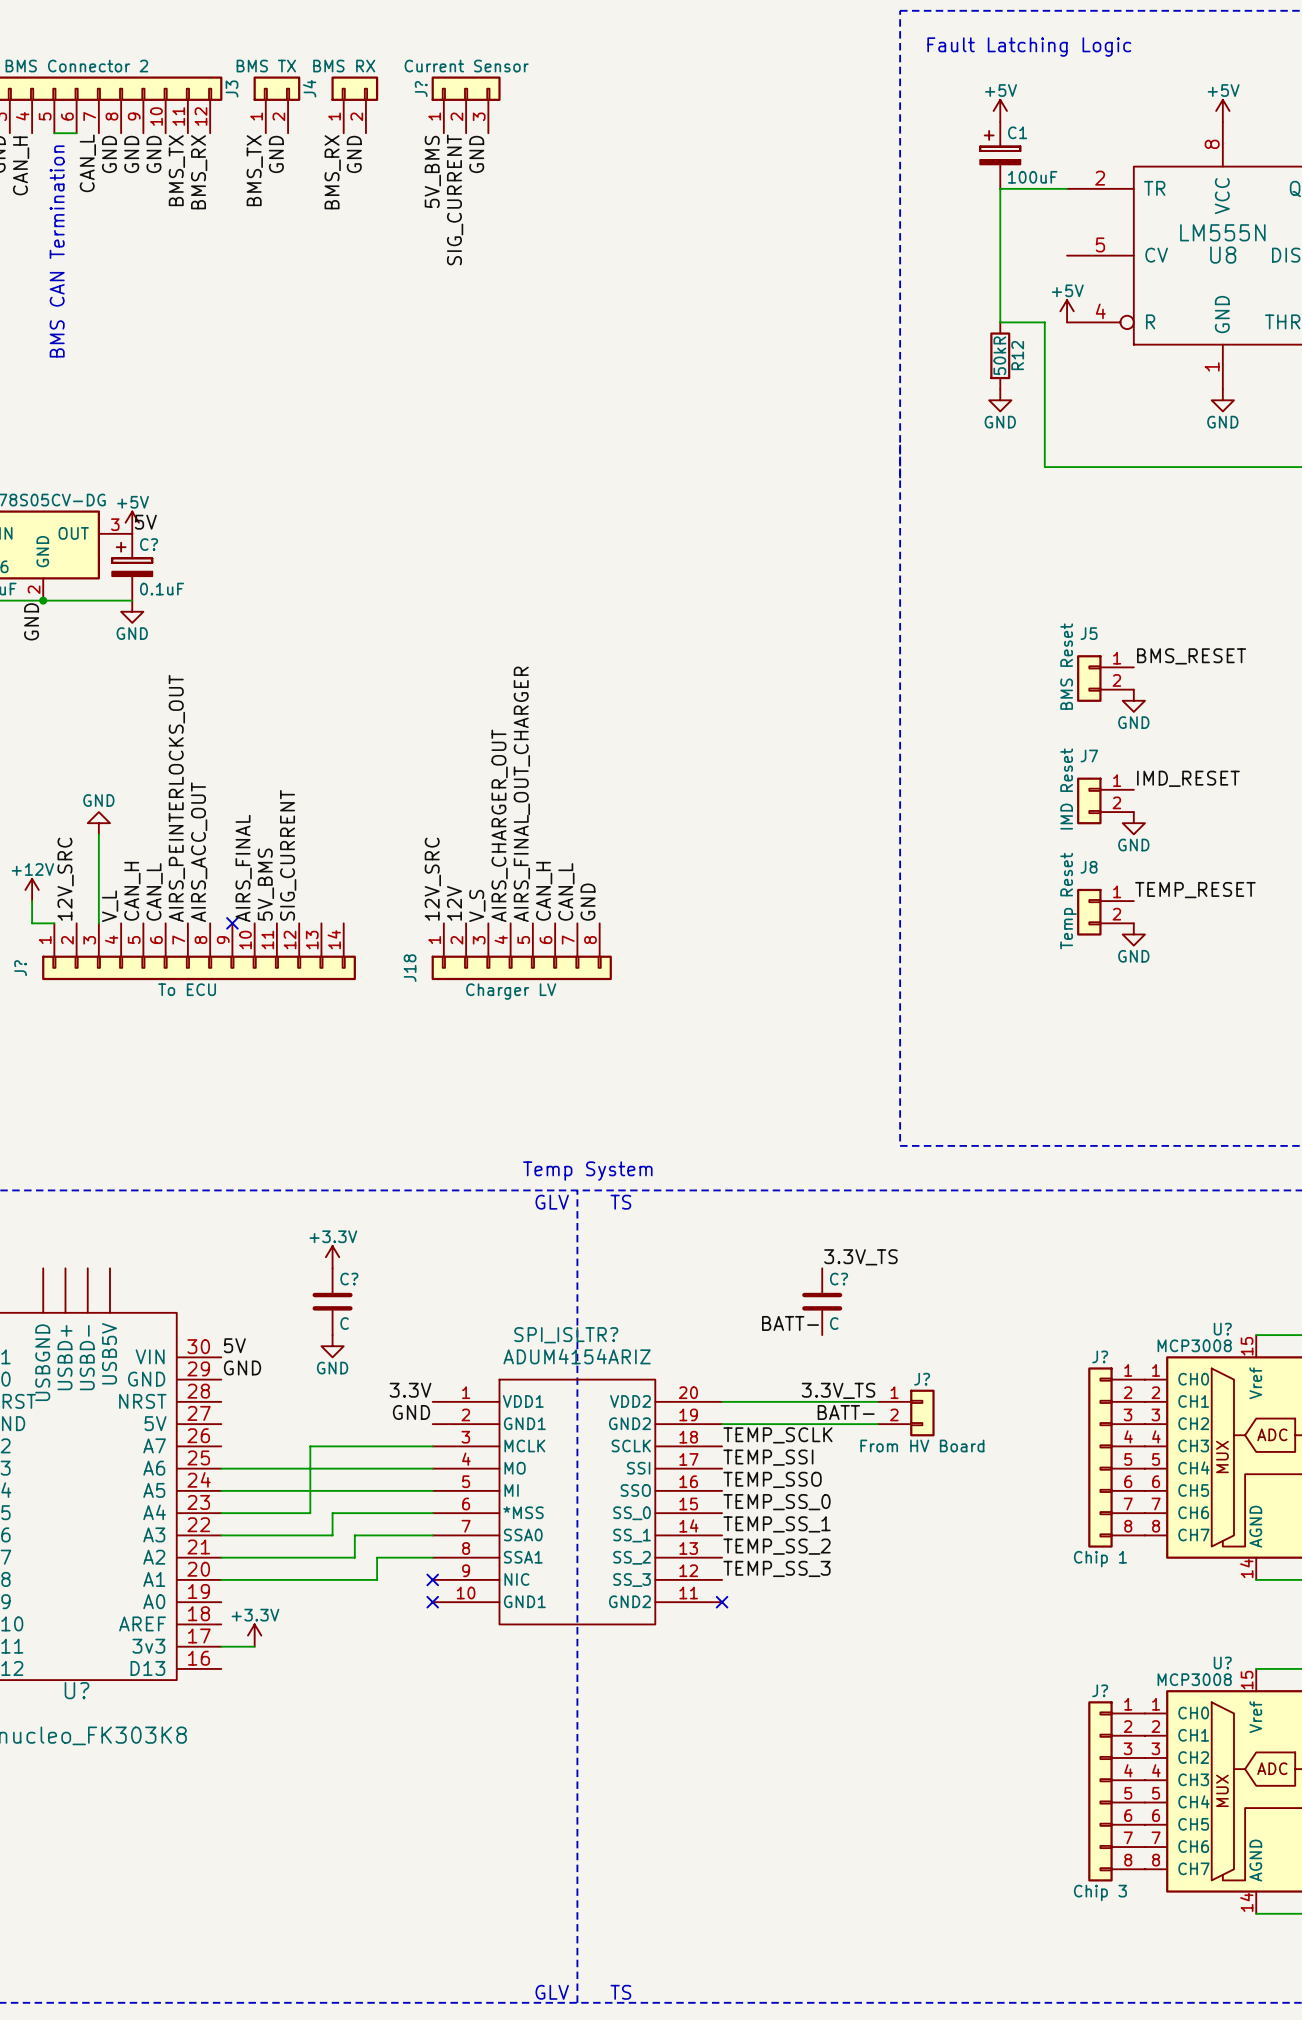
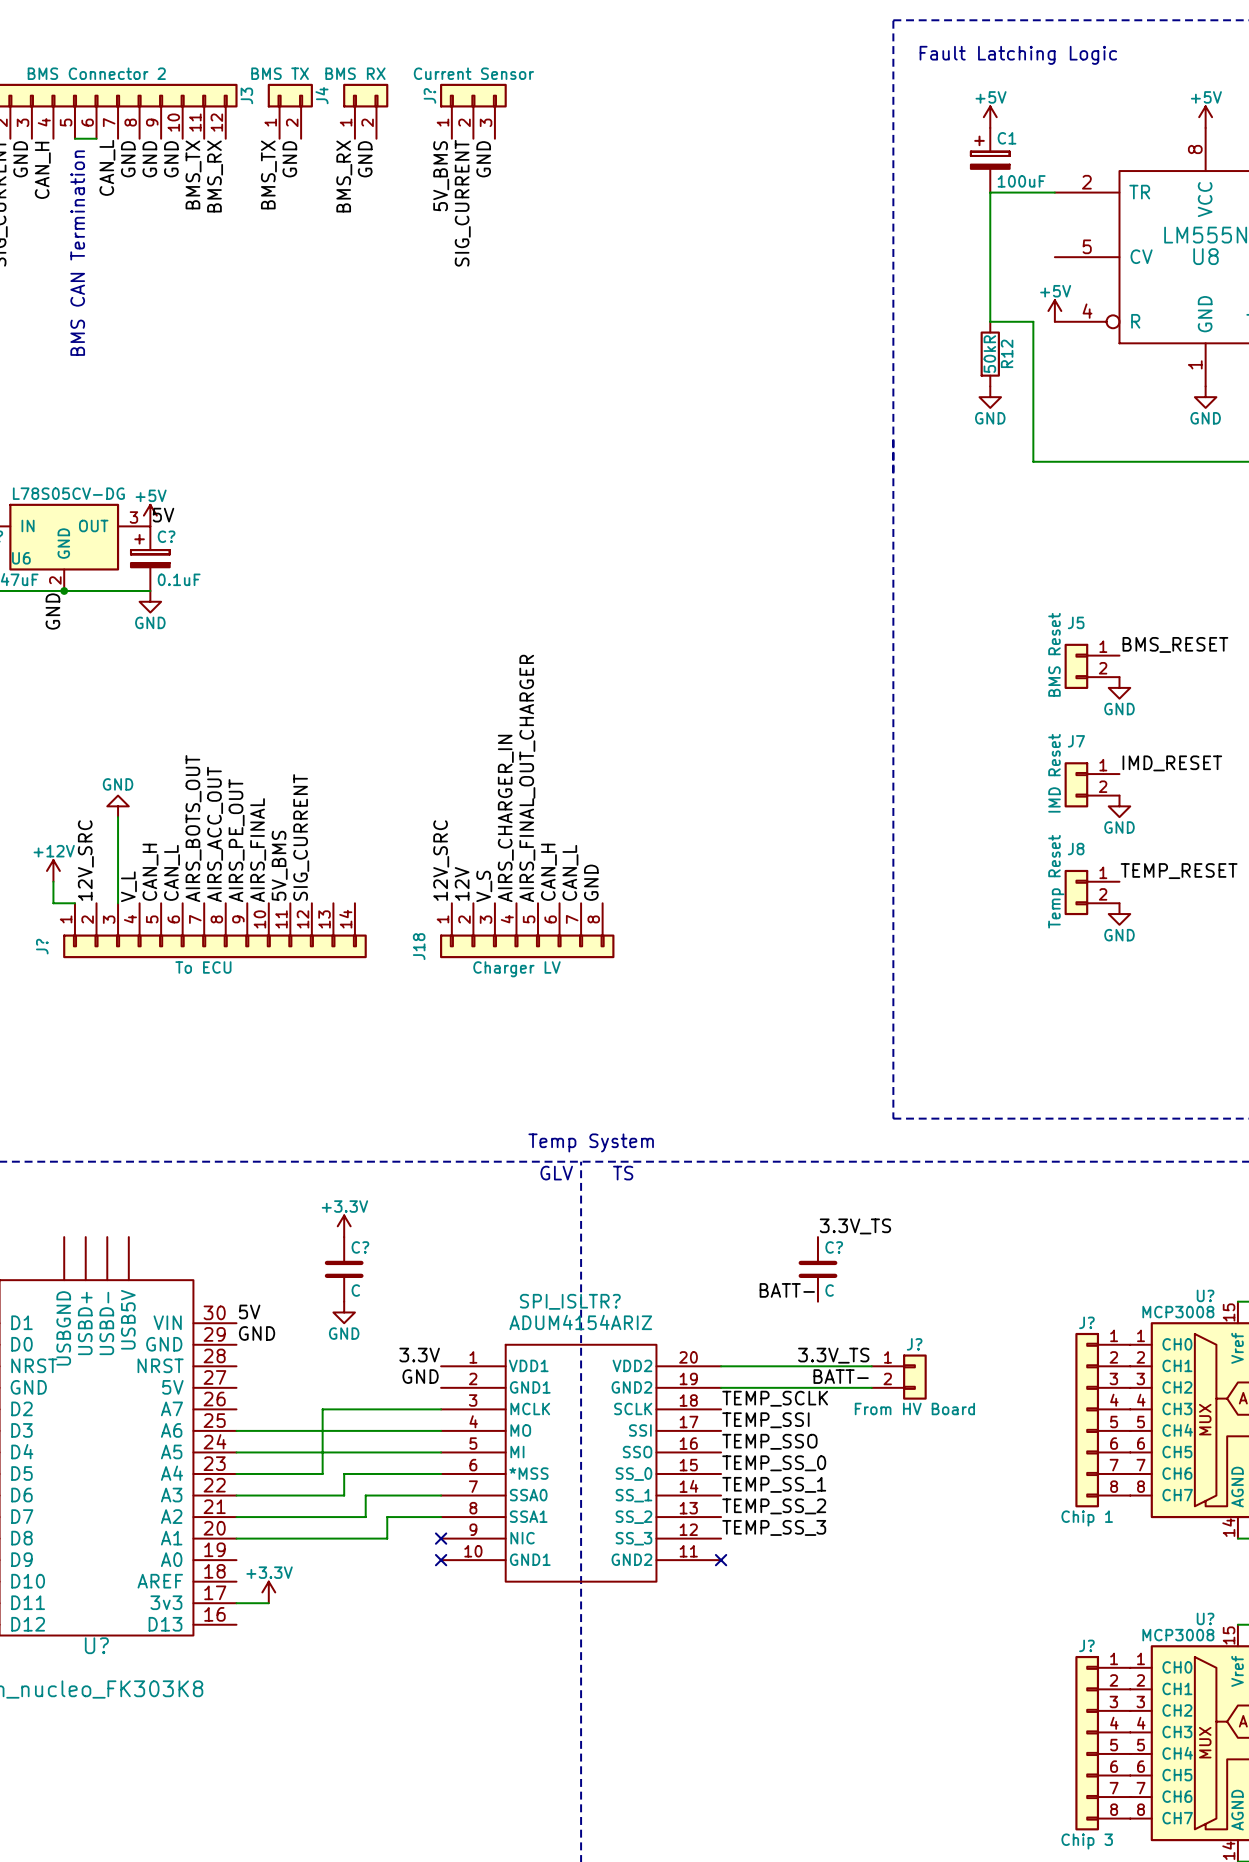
label: AIRS_PEINTERLOCKS_OUT (176, 798) -> AIRS_BOTS_OUT (193, 828)
label: AIRS_CHARGER_OUT (499, 825) -> AIRS_CHARGER_IN (505, 818)
label: none -> AIRS_PE_OUT (236, 840)
no-connect mark: (232, 923) -> none

